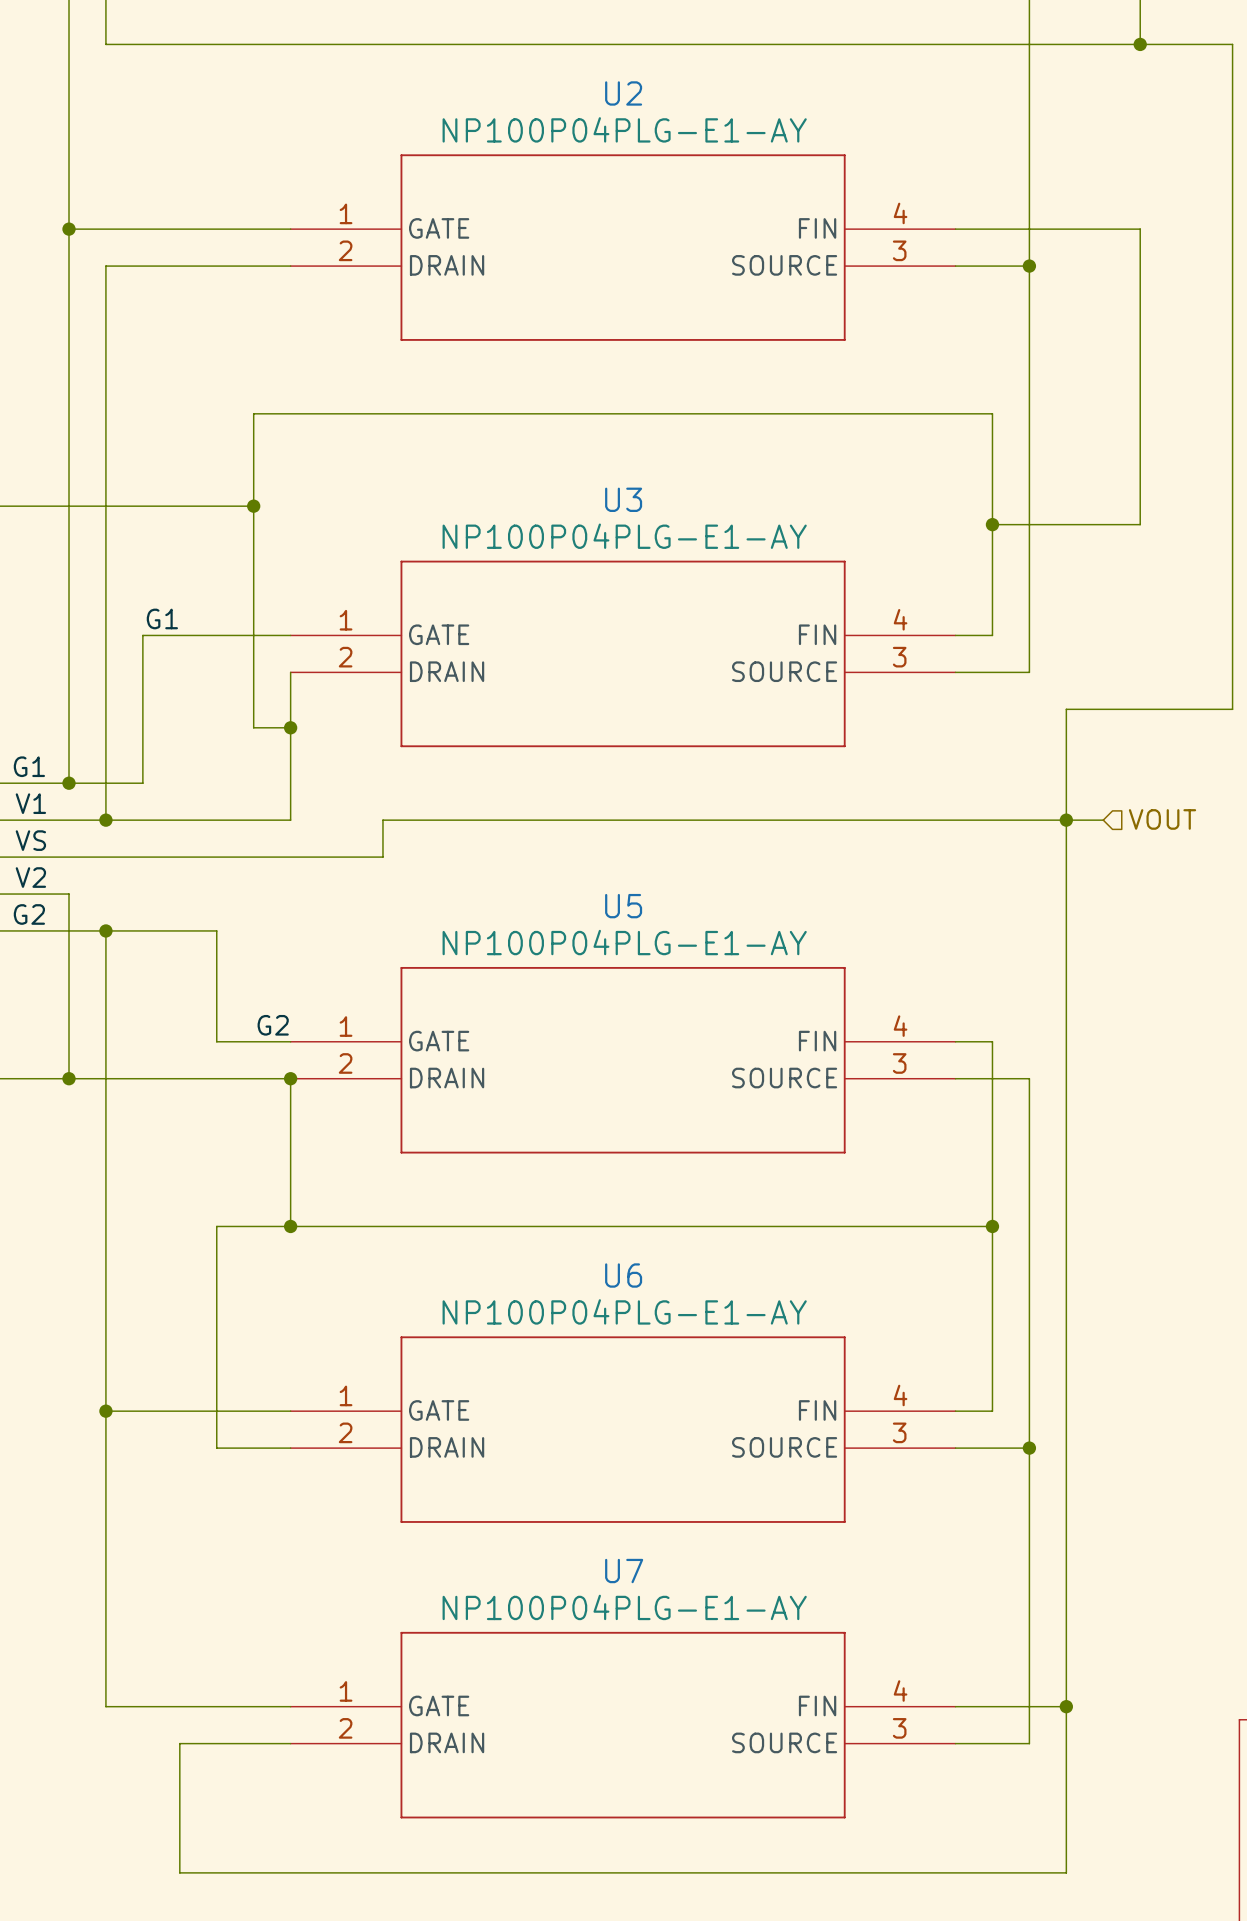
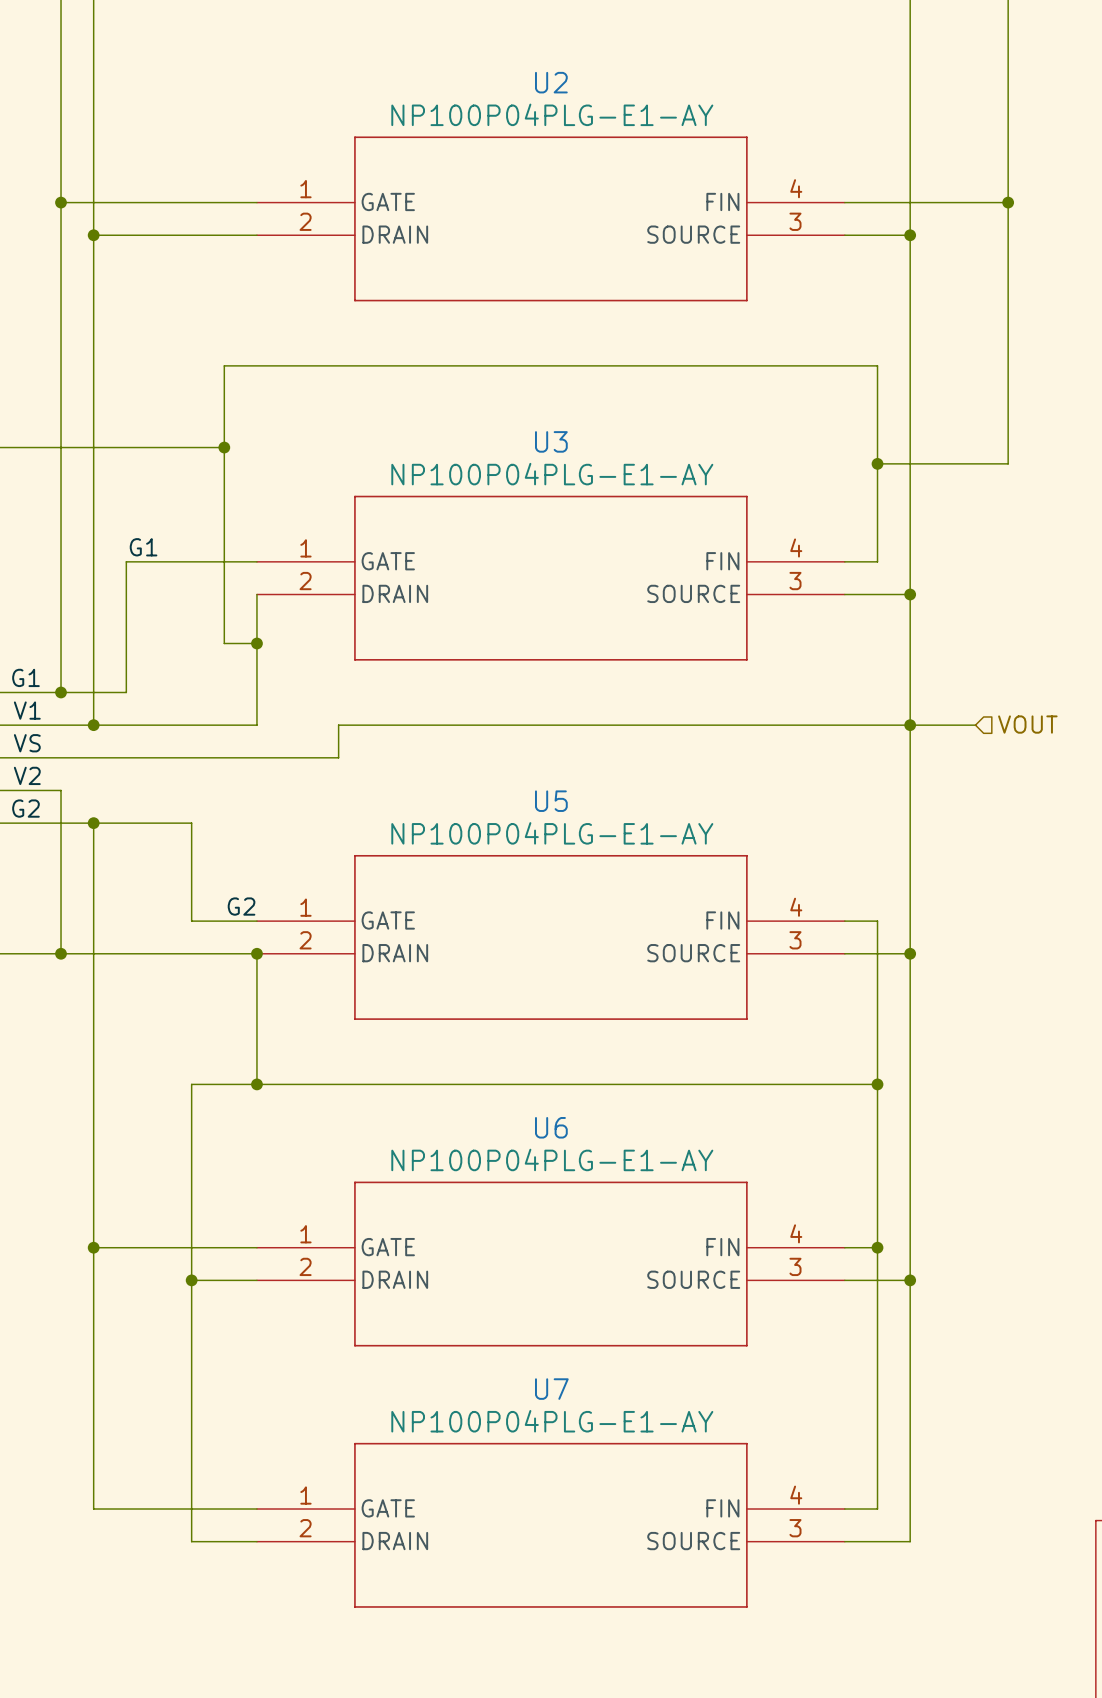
wire: (105, 44) (1232, 44) (1232, 709) (1066, 709) (1066, 1872) (179, 1872) (179, 1743) (216, 1743) -> (191, 1280) (191, 1541)
wire: none -> (93, 39) (93, 235)
wire: none -> (1008, 39) (1008, 202)
junction: (1140, 44) -> none
junction: none -> (1008, 202)
junction: none -> (93, 235)
wire: none -> (910, 594) (910, 953)
junction: none -> (910, 594)
junction position: (1066, 820) -> (910, 725)
junction: none -> (910, 953)
junction: none -> (877, 1247)
junction: none -> (191, 1280)
wire: (992, 1706) (1066, 1706) -> (877, 1509) (877, 1247)
junction: (1066, 1706) -> none

